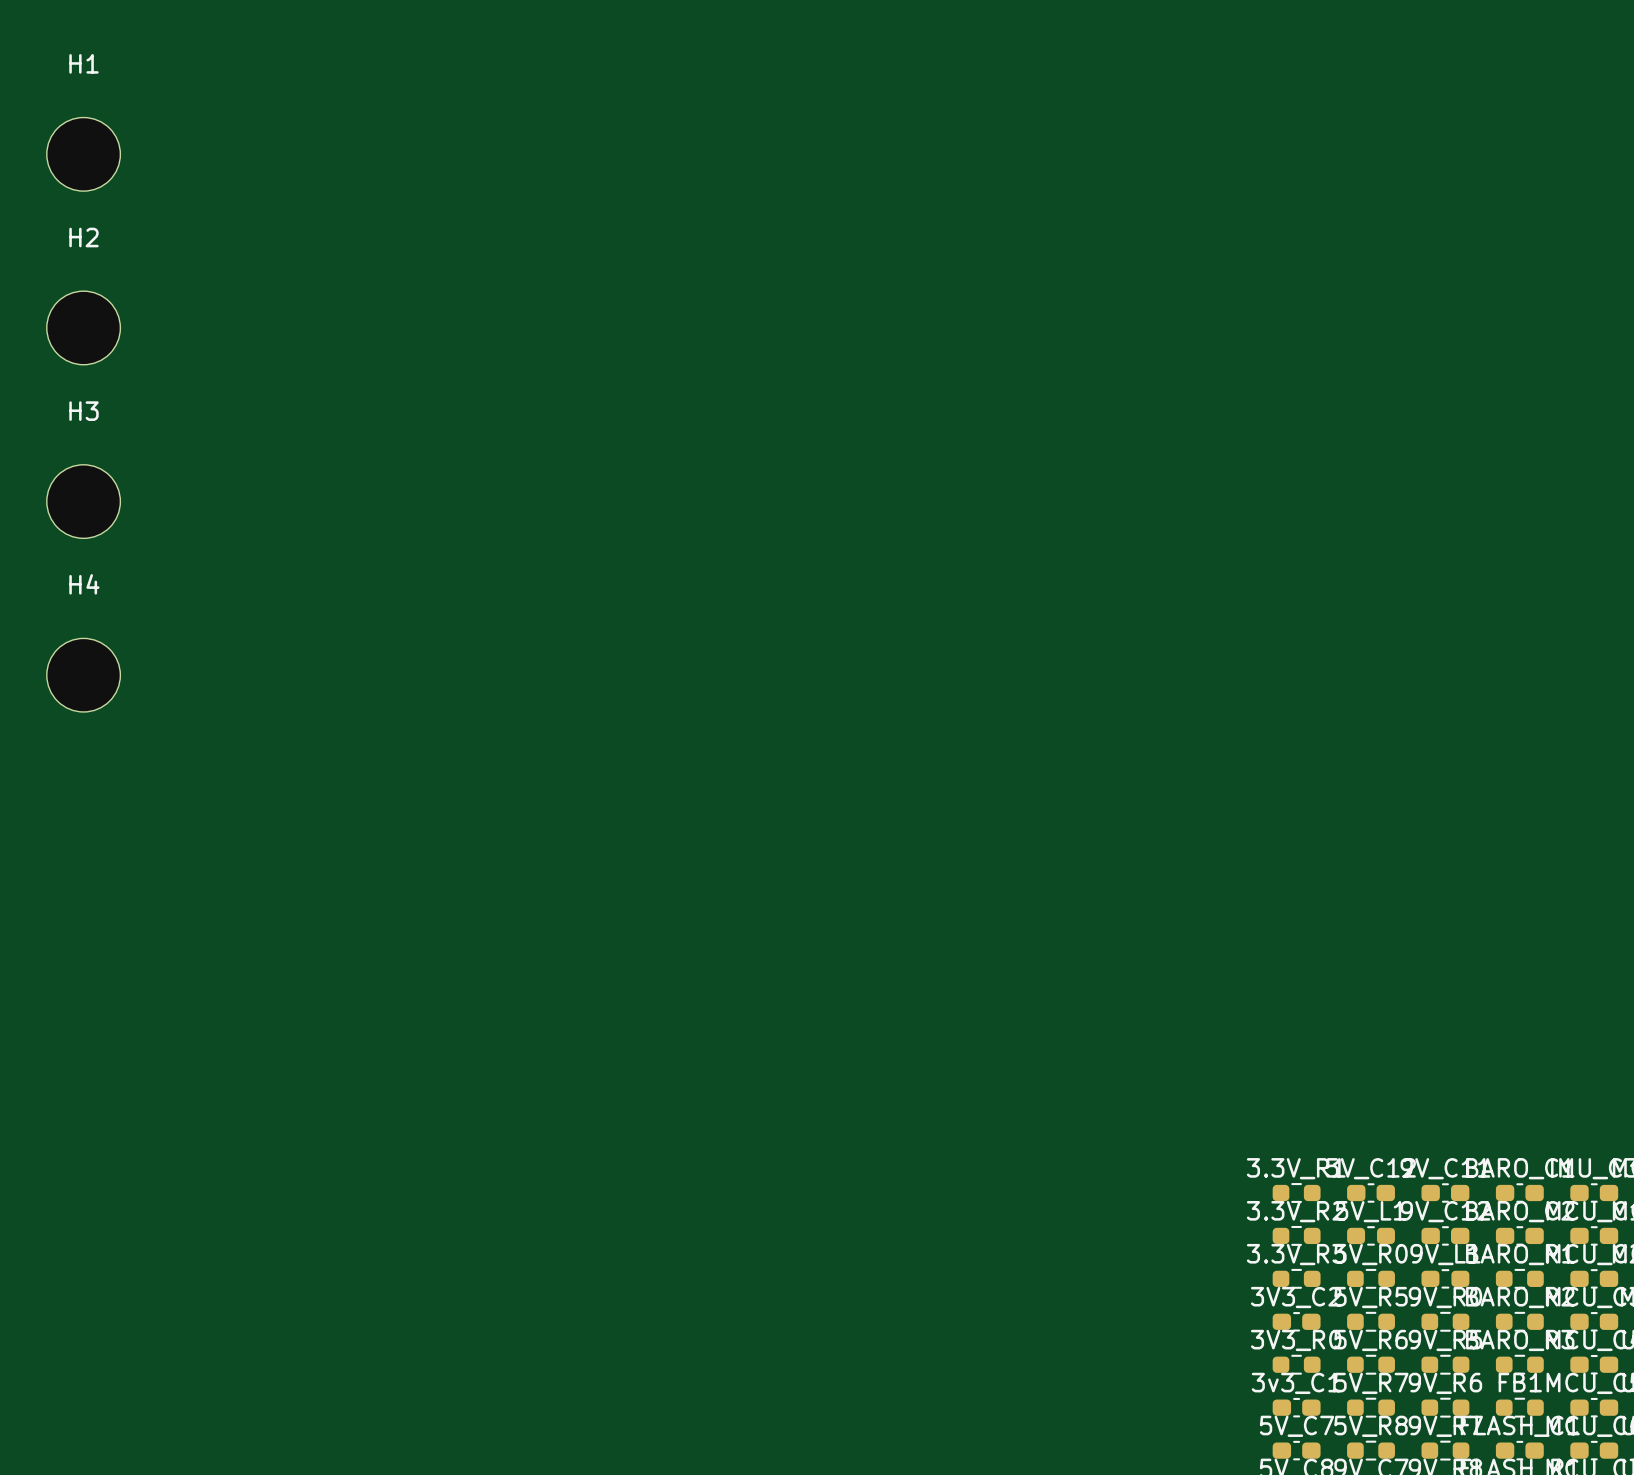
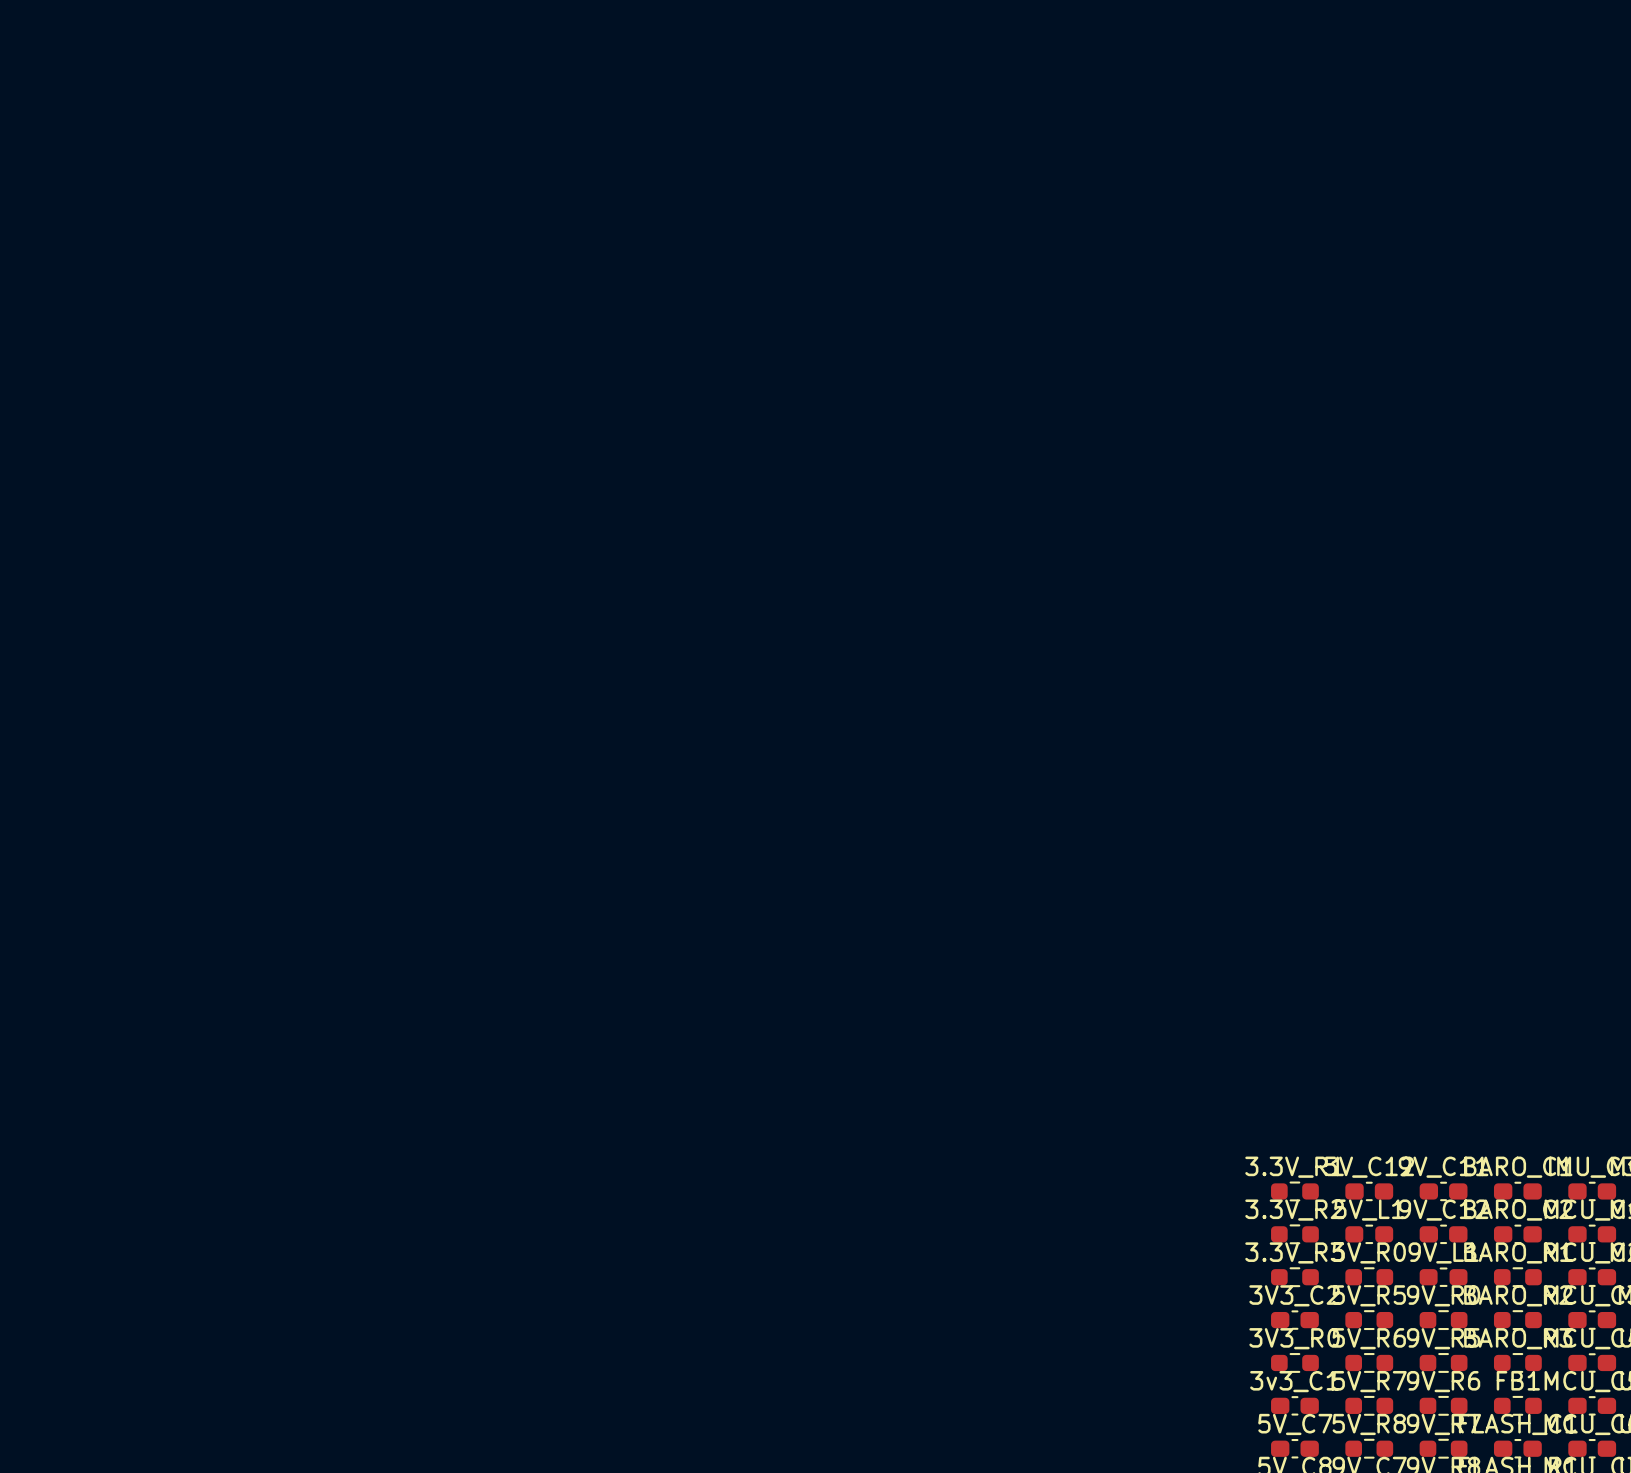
H1: (83, 154) -> none
H2: (83, 327) -> none
H3: (83, 501) -> none
H4: (83, 675) -> none

